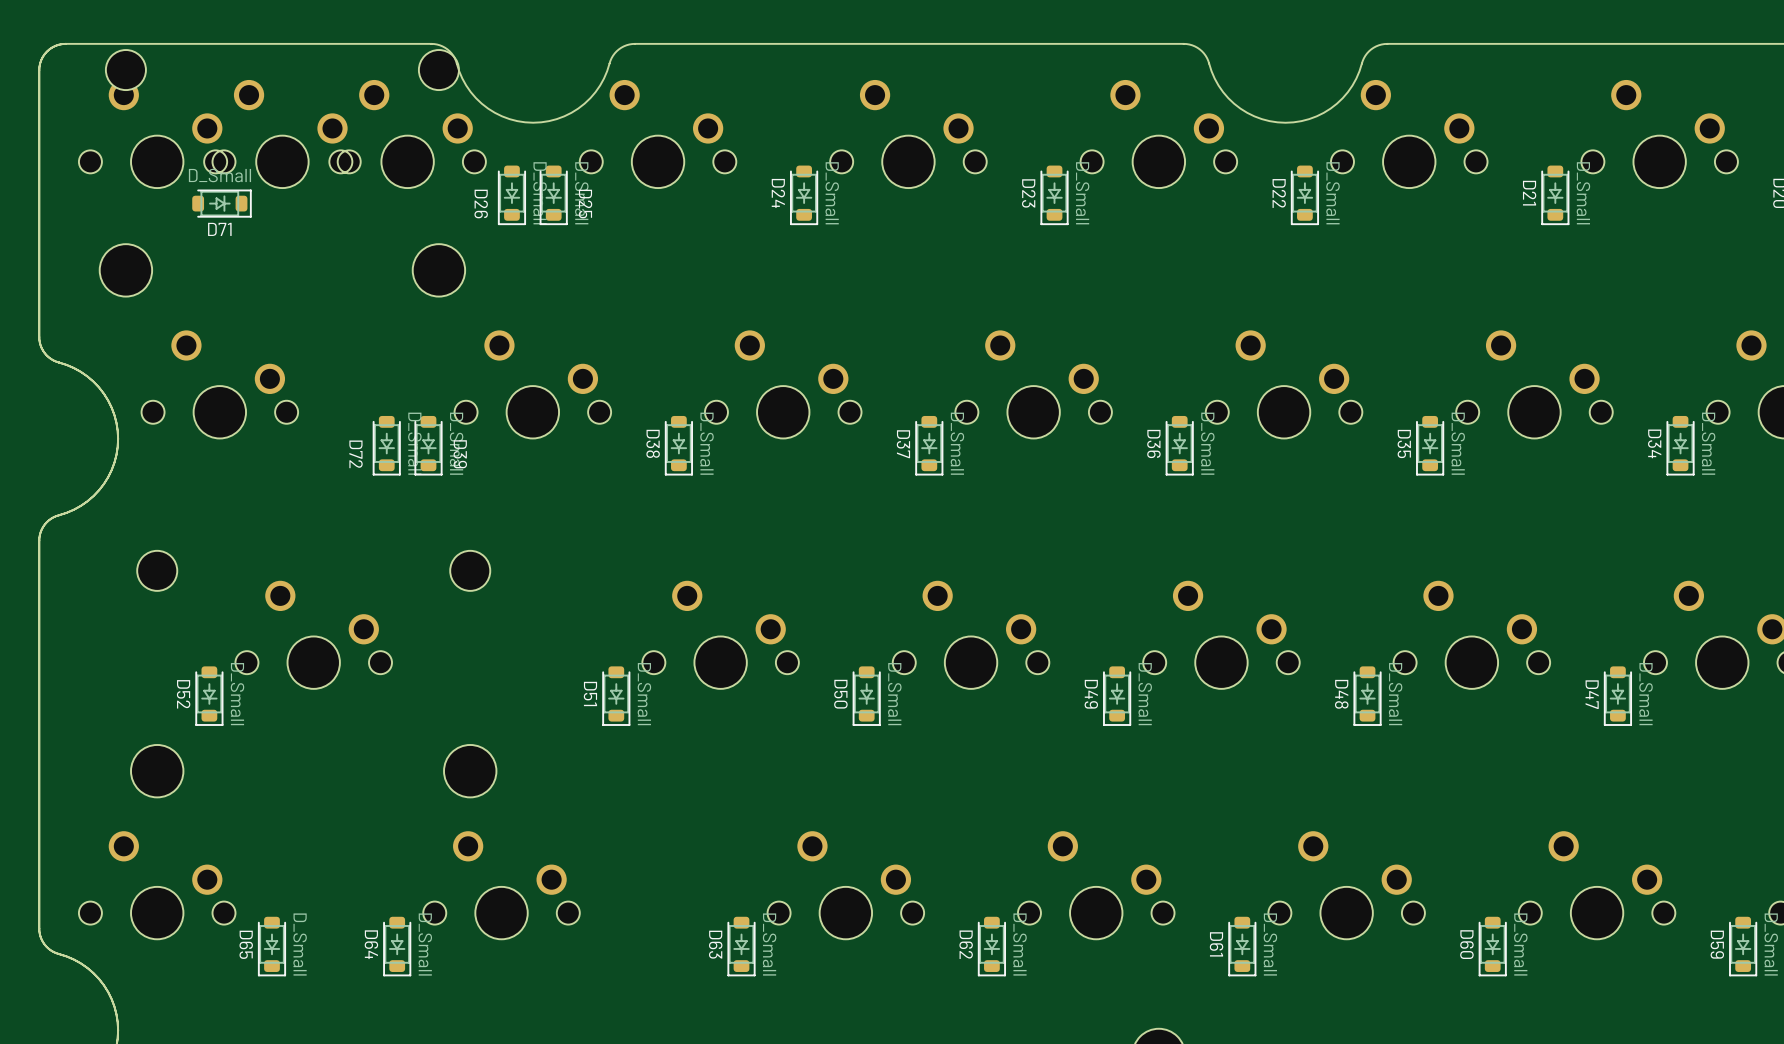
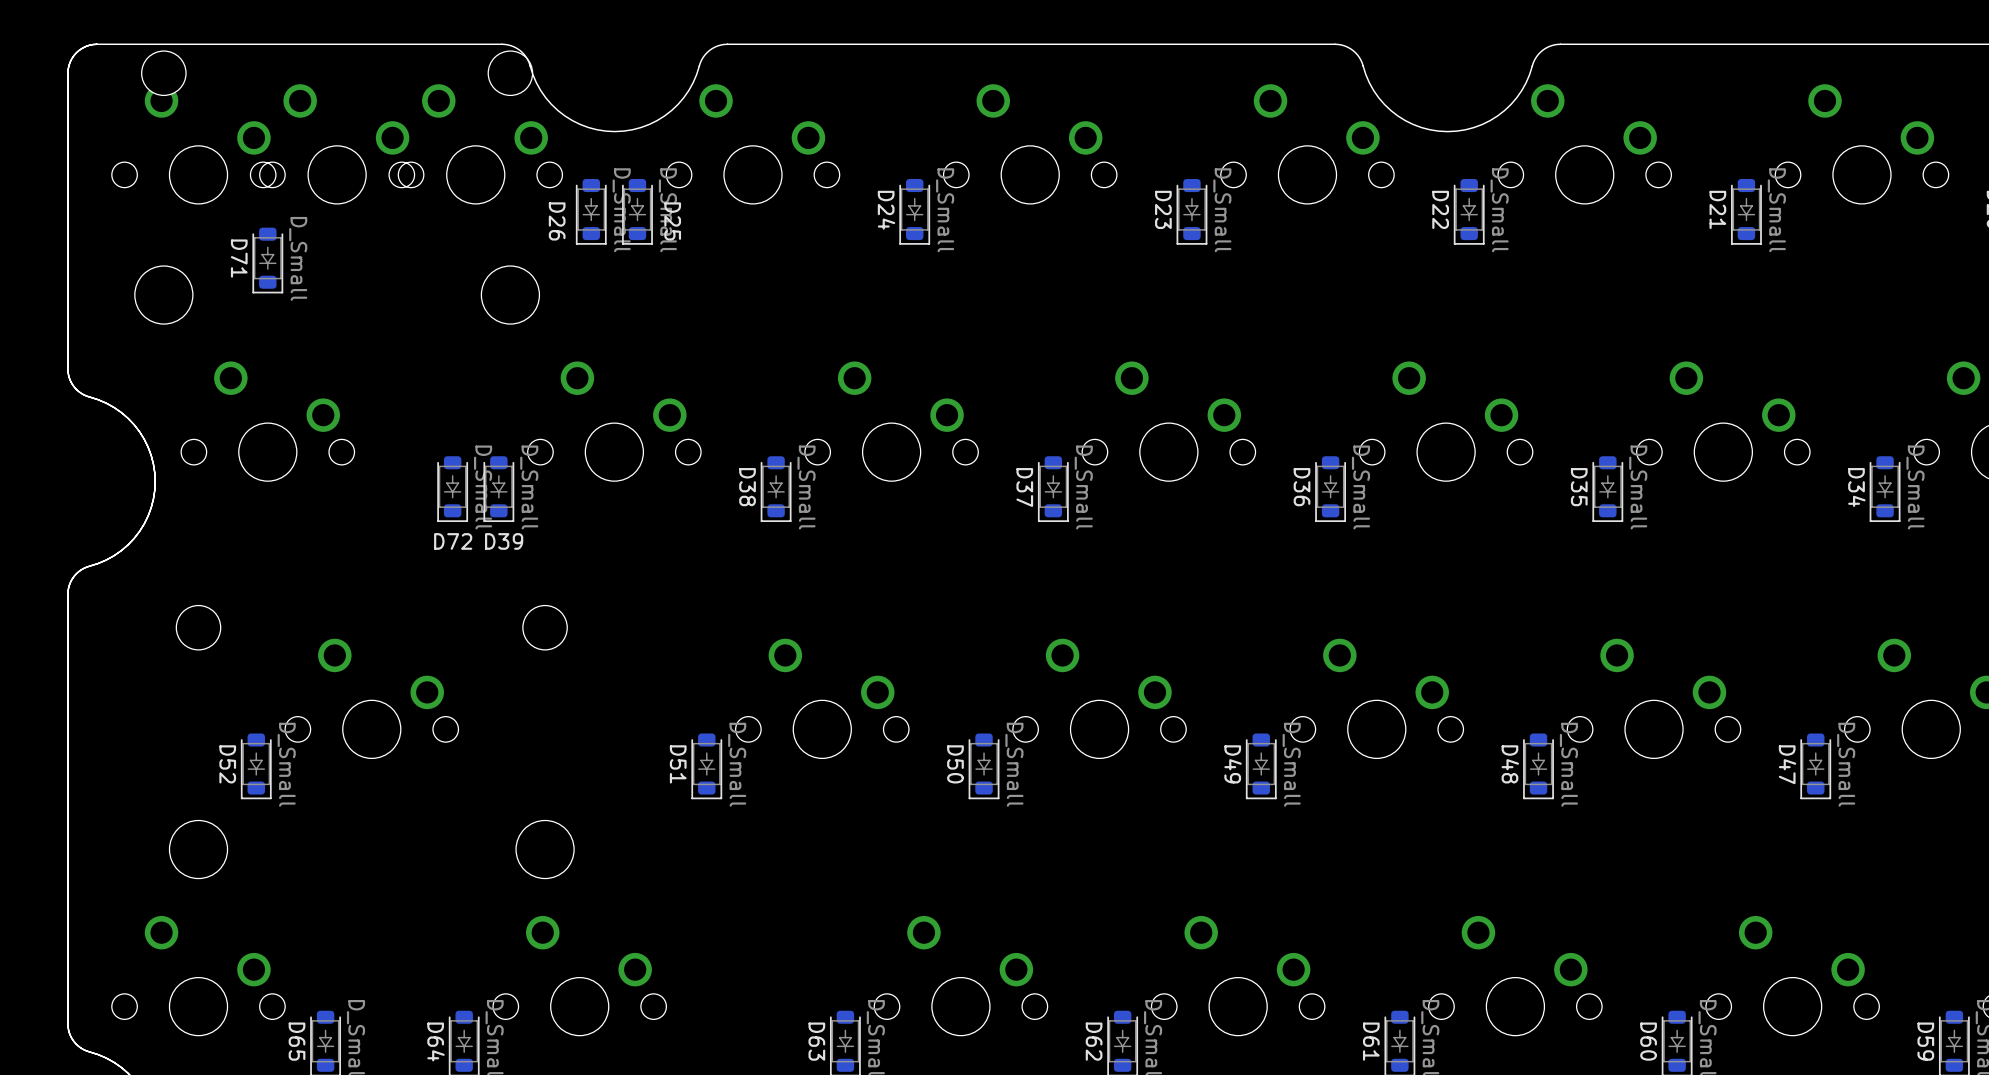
D71 rotation: 0° (221, 203) -> 90° clockwise (267, 260)
D71 position: (221, 203) -> (267, 260)
D72 name rotation: 0° (356, 454) -> 90° counterclockwise (453, 541)
D72 name position: D72 (356, 454) -> D72 (453, 541)
D39 name rotation: 0° (460, 454) -> 90° counterclockwise (504, 541)
D39 name position: D39 (460, 454) -> D39 (504, 541)

